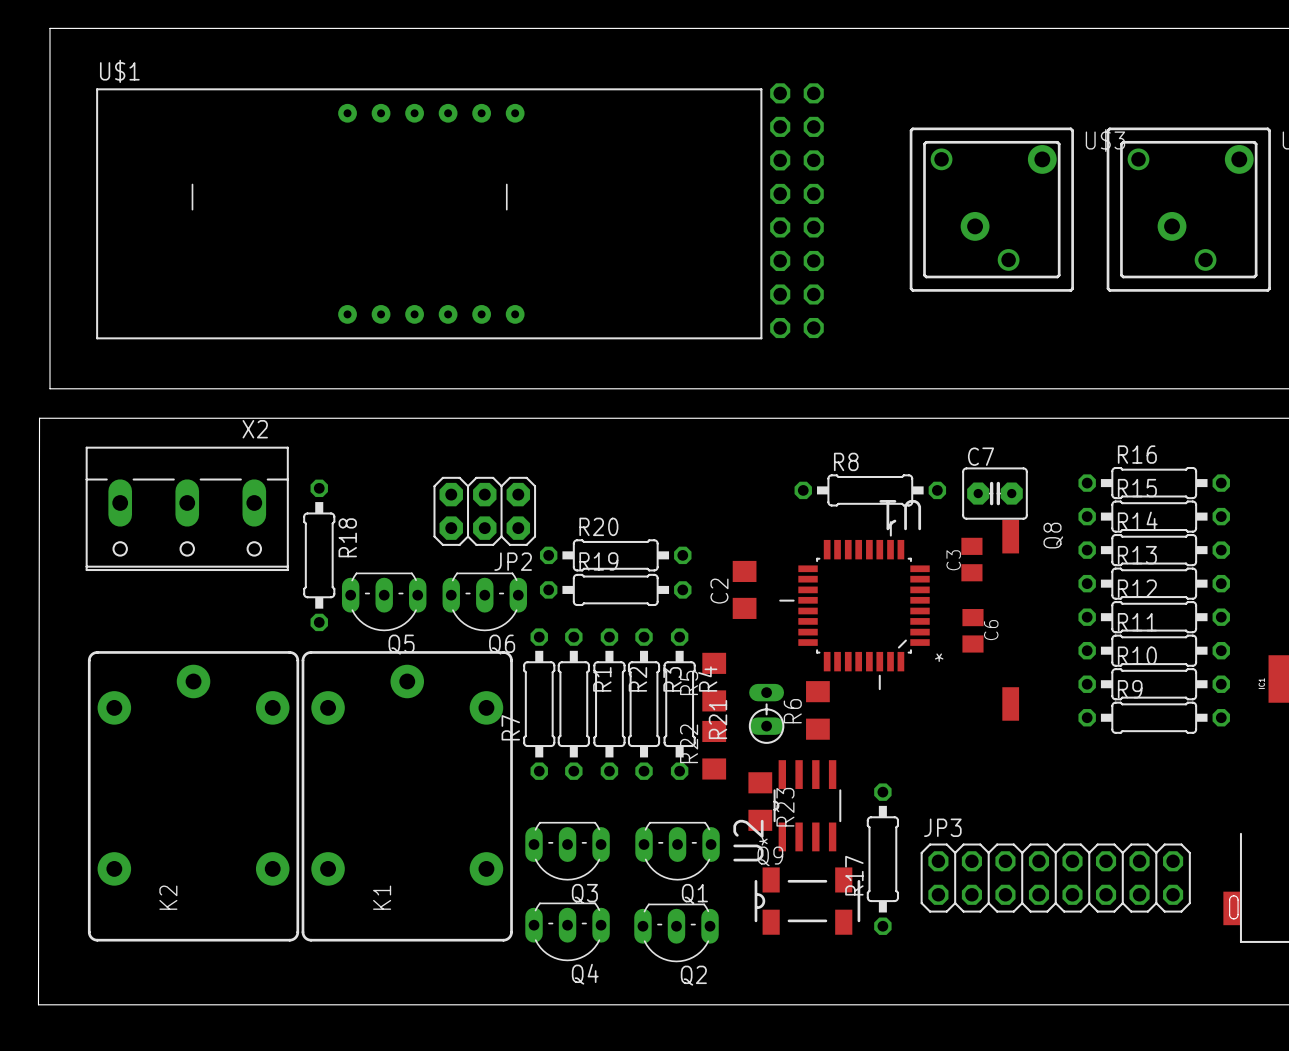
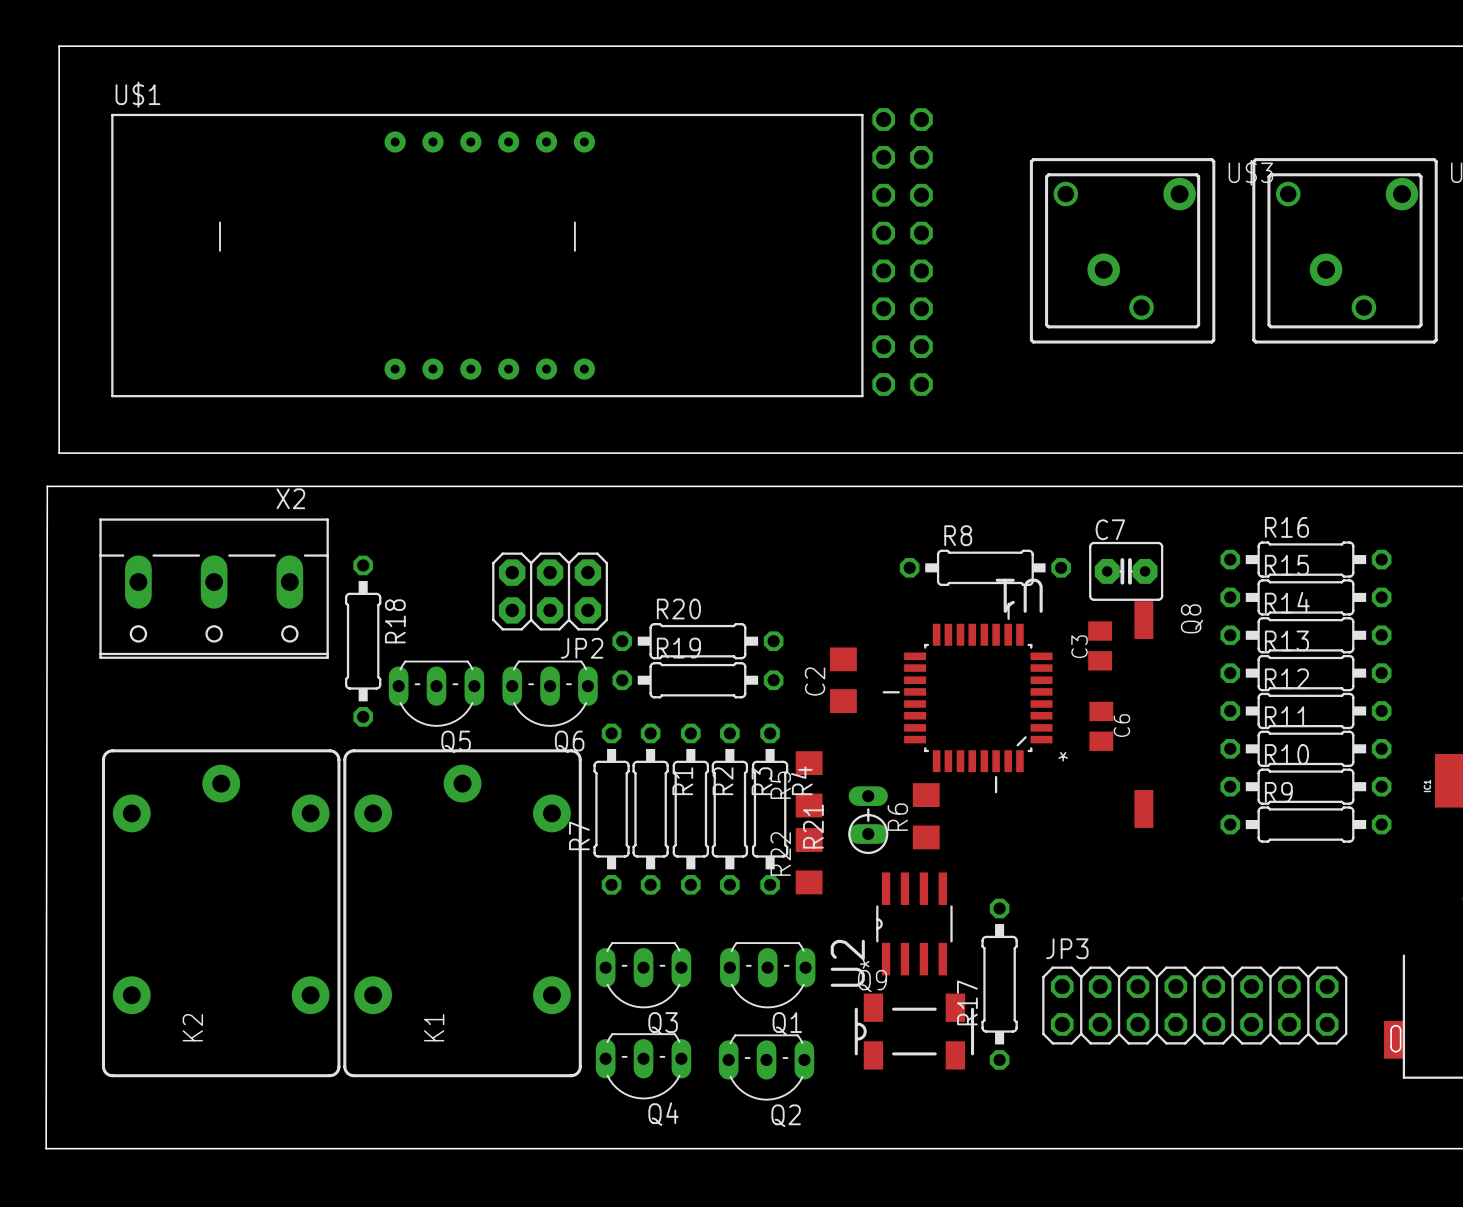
R23: (760, 801) -> none

